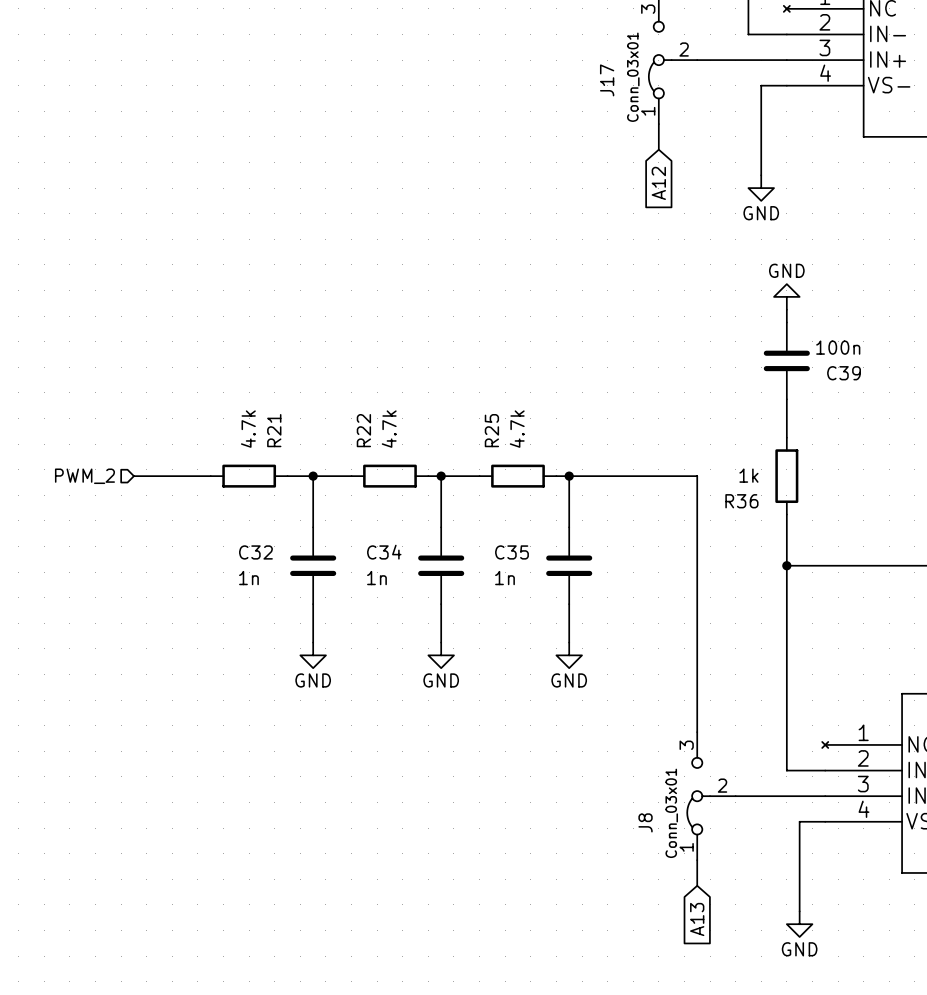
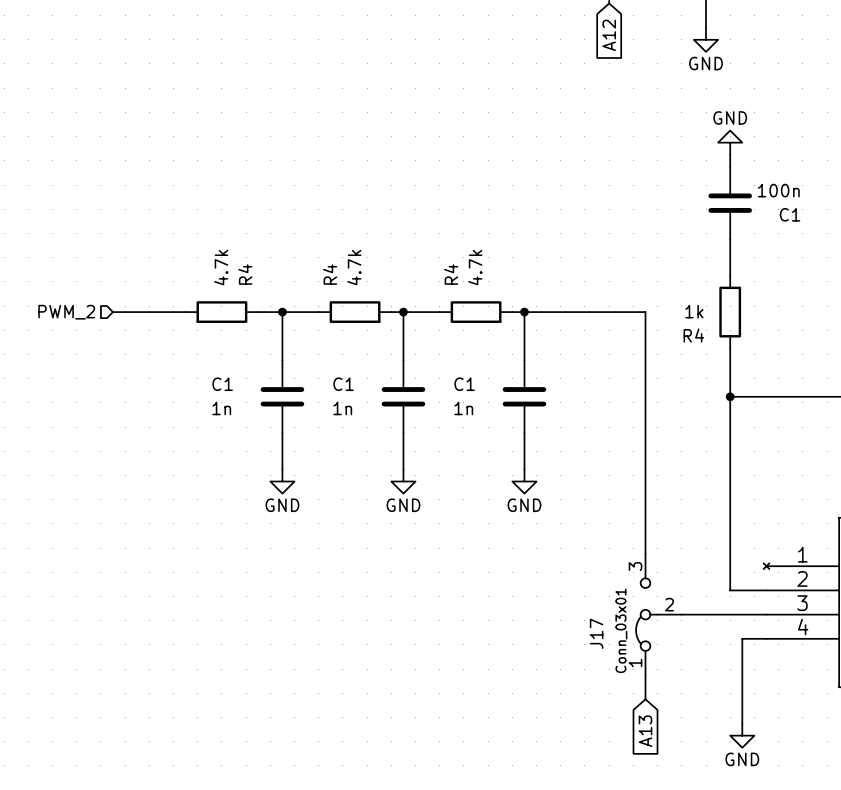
C39 name: C39 (844, 373) -> C1 (790, 214)
R21 name: R21 (274, 430) -> R4 (245, 274)
R22 name: R22 (363, 430) -> R4 (330, 274)
R25 name: R25 (491, 430) -> R4 (451, 274)
R36 name: R36 (741, 501) -> R4 (693, 335)
C32 name: C32 (255, 552) -> C1 (222, 384)
C34 name: C34 (384, 552) -> C1 (343, 384)
C35 name: C35 (512, 552) -> C1 (464, 384)
J8 name: J8 (645, 822) -> J17 (596, 633)

